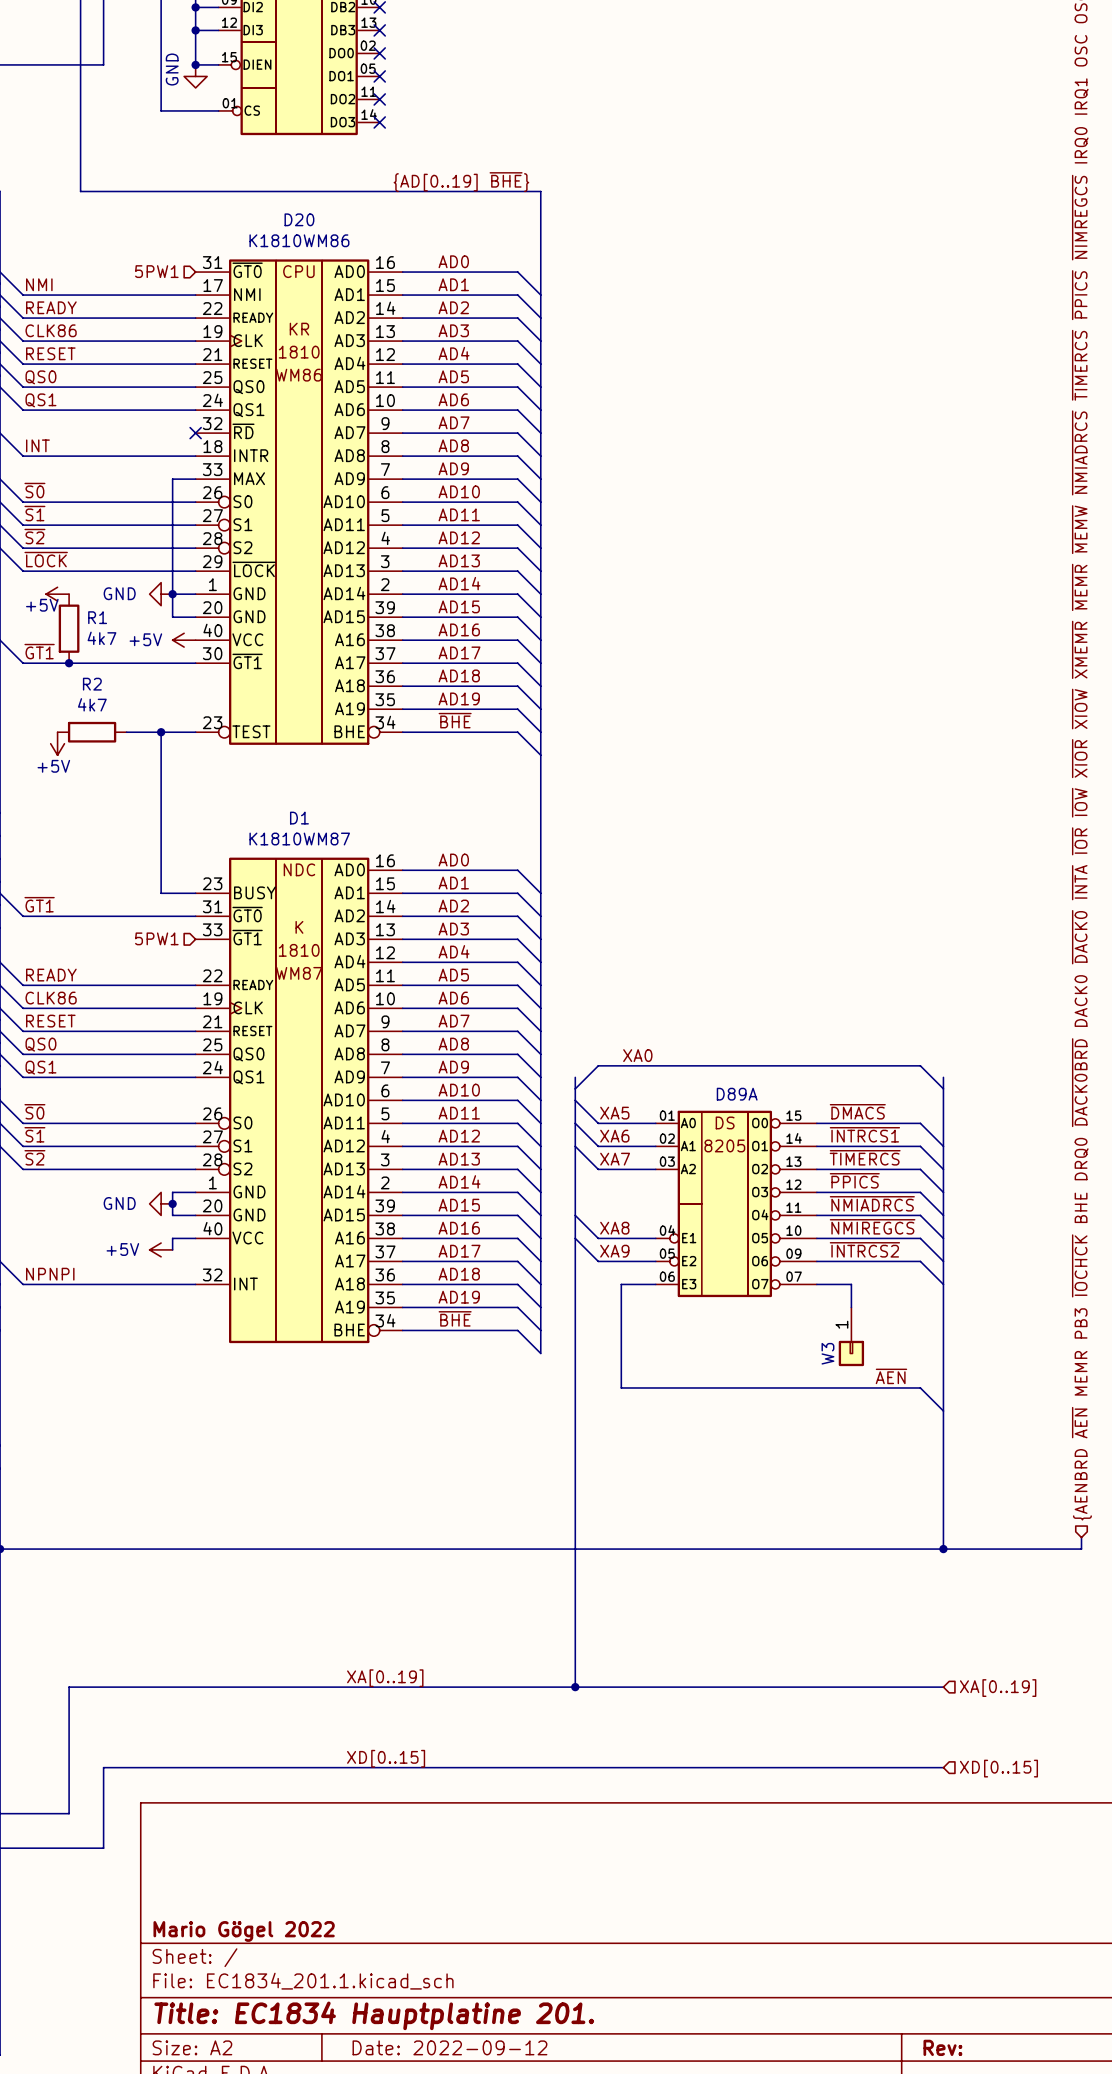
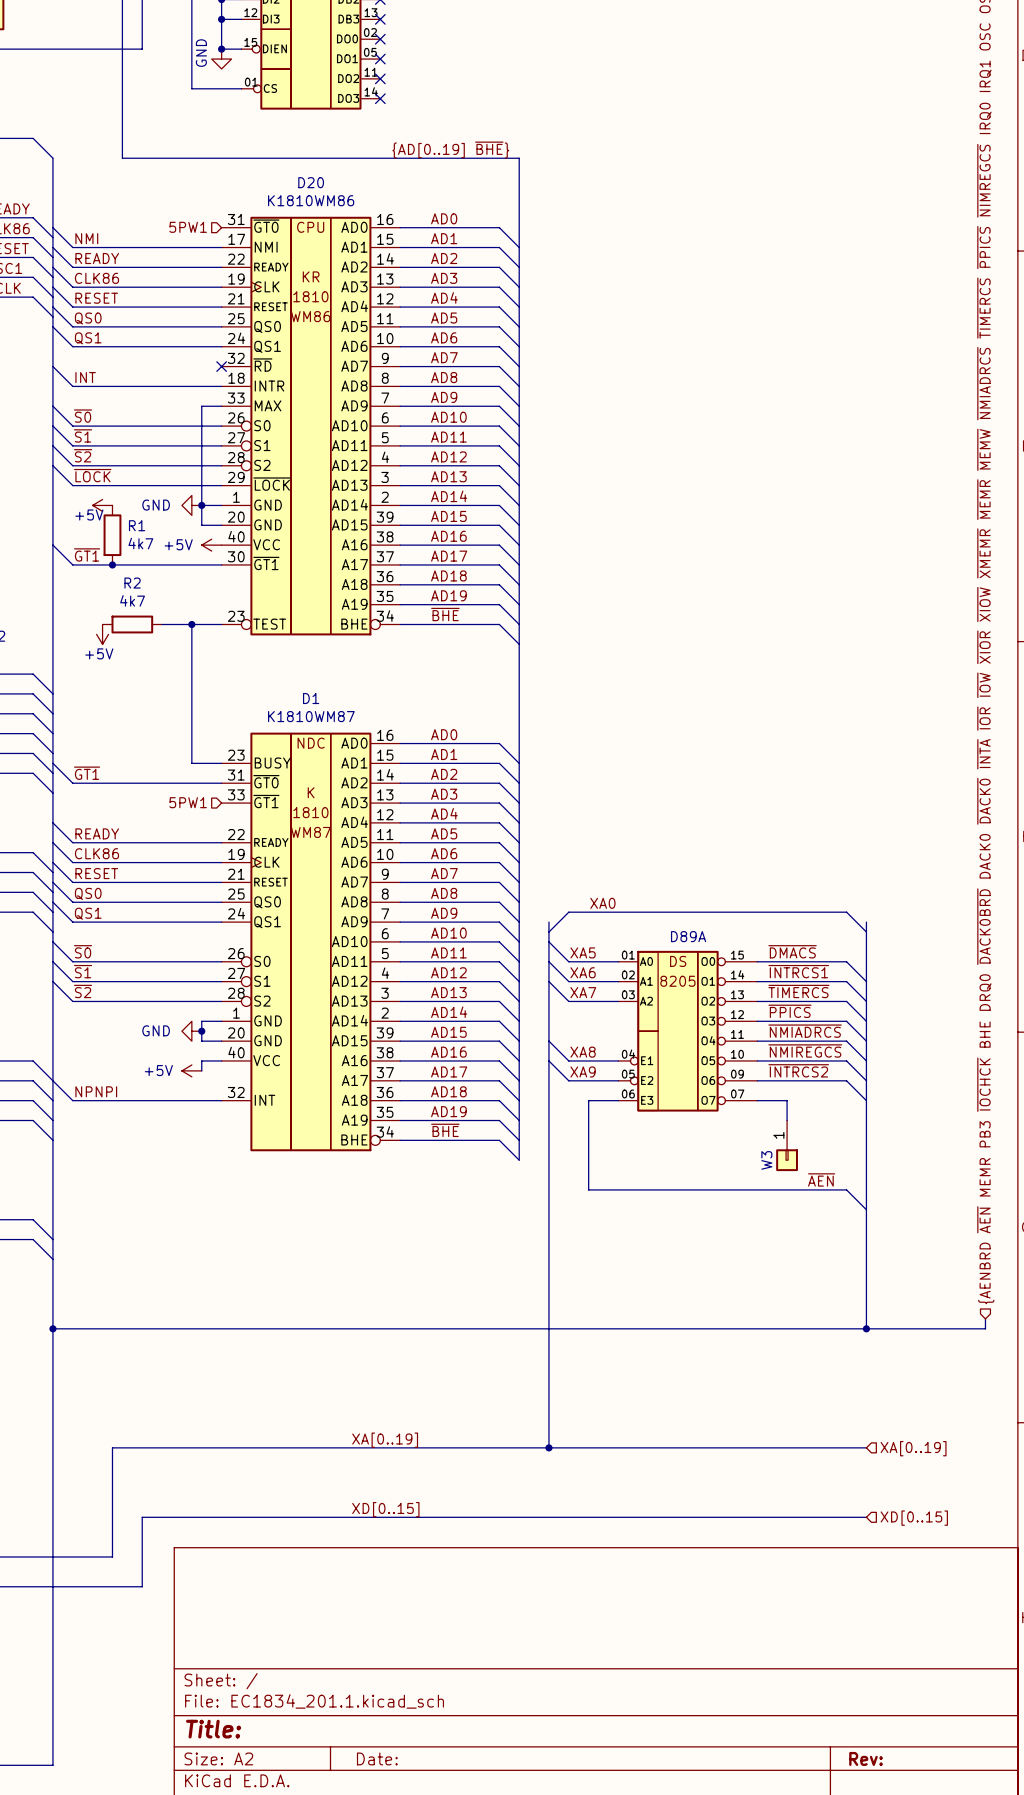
title block: Mario Gögel 2022 (244, 1931) -> none
title block: Title: EC1834 Hauptplatine 201. (374, 2015) -> Title: (213, 1729)
title block: Date: 2022-09-12 (449, 2047) -> Date: (377, 1758)

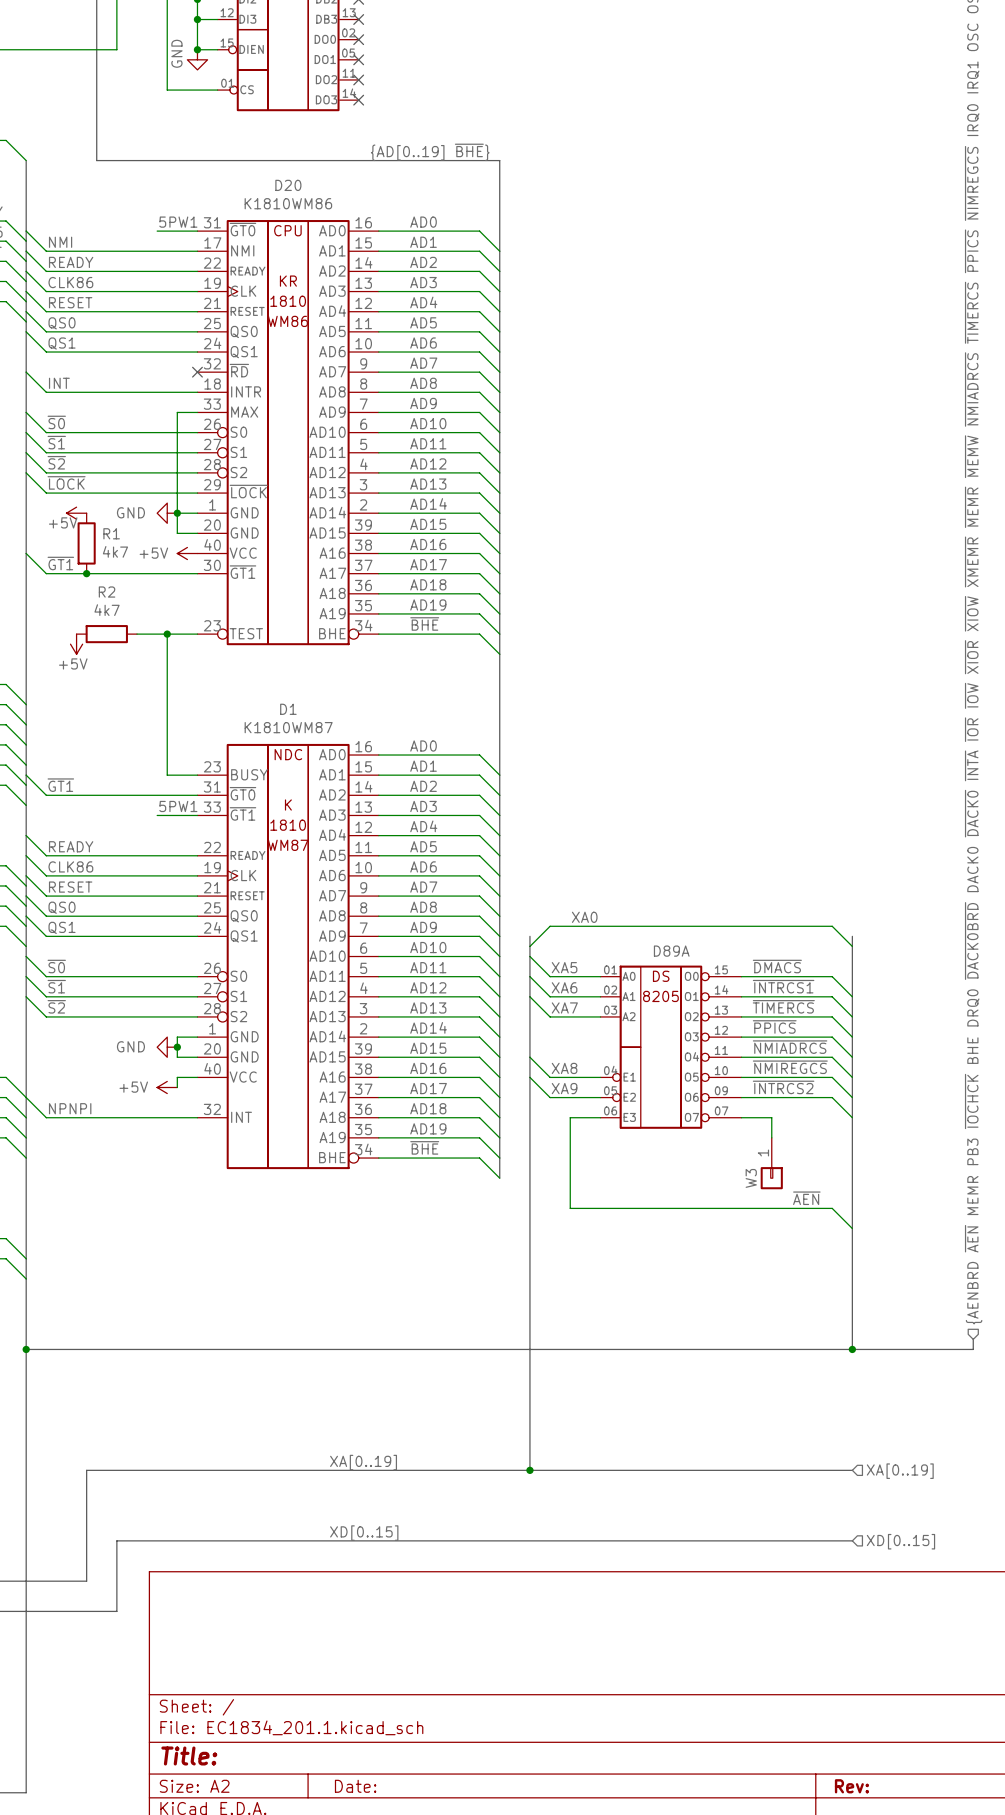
label: none -> 5PW1 (178, 222)
wire: none -> (157, 231) (197, 231)
hierarchical label: 5PW1 (188, 227) -> none
label: none -> 5PW1 (178, 806)
hierarchical label: 5PW1 (188, 802) -> none
wire: none -> (157, 815) (197, 815)

